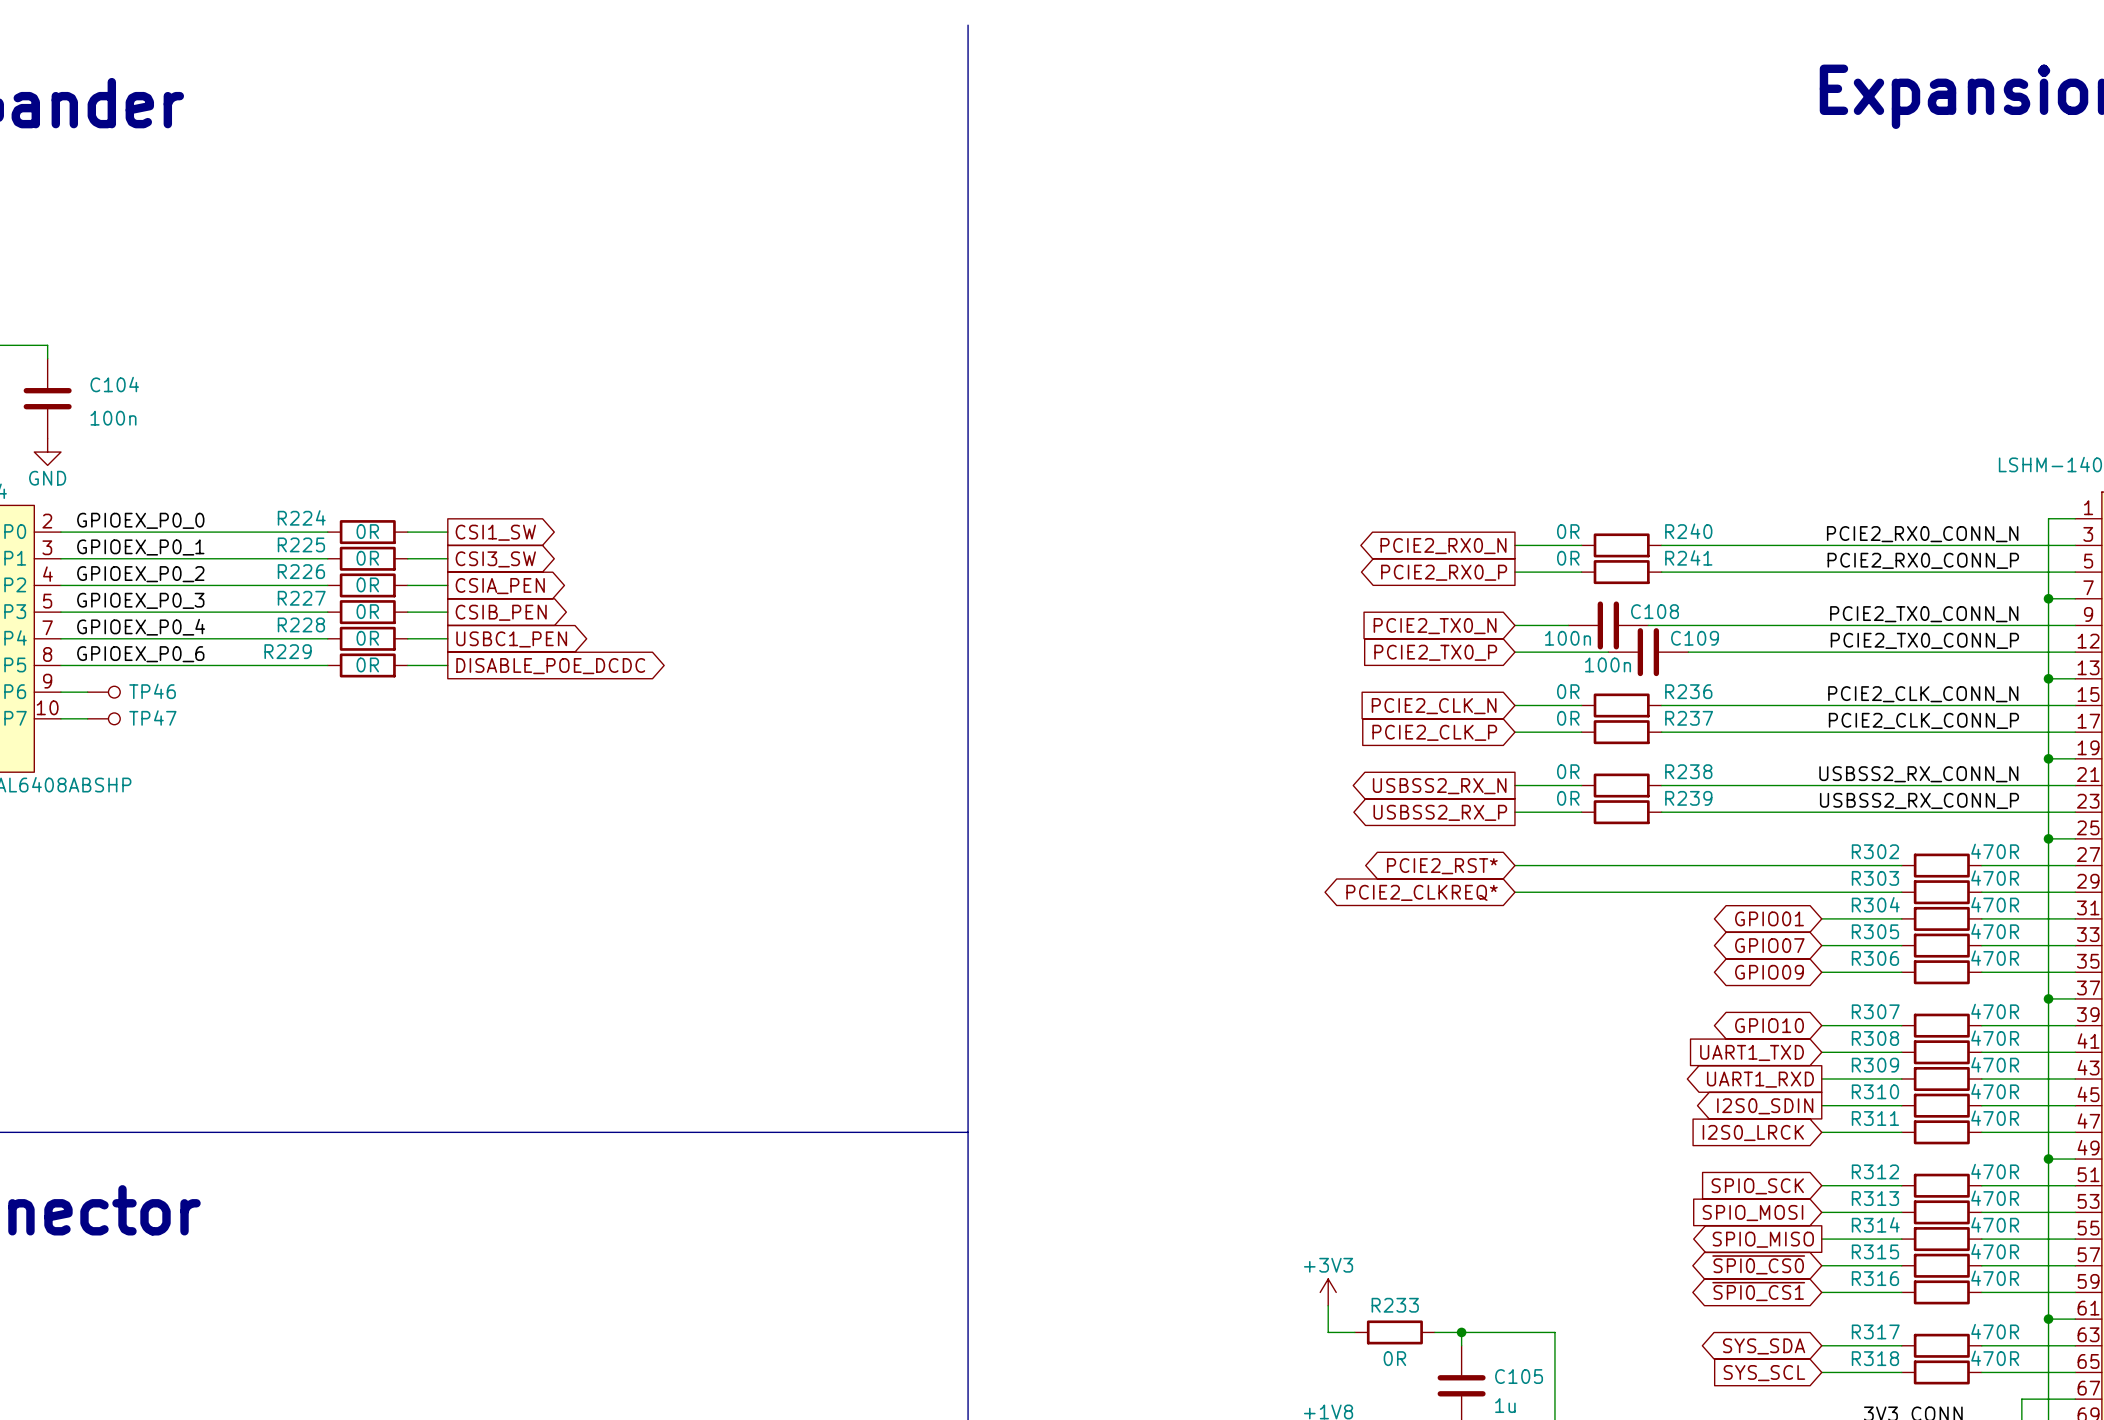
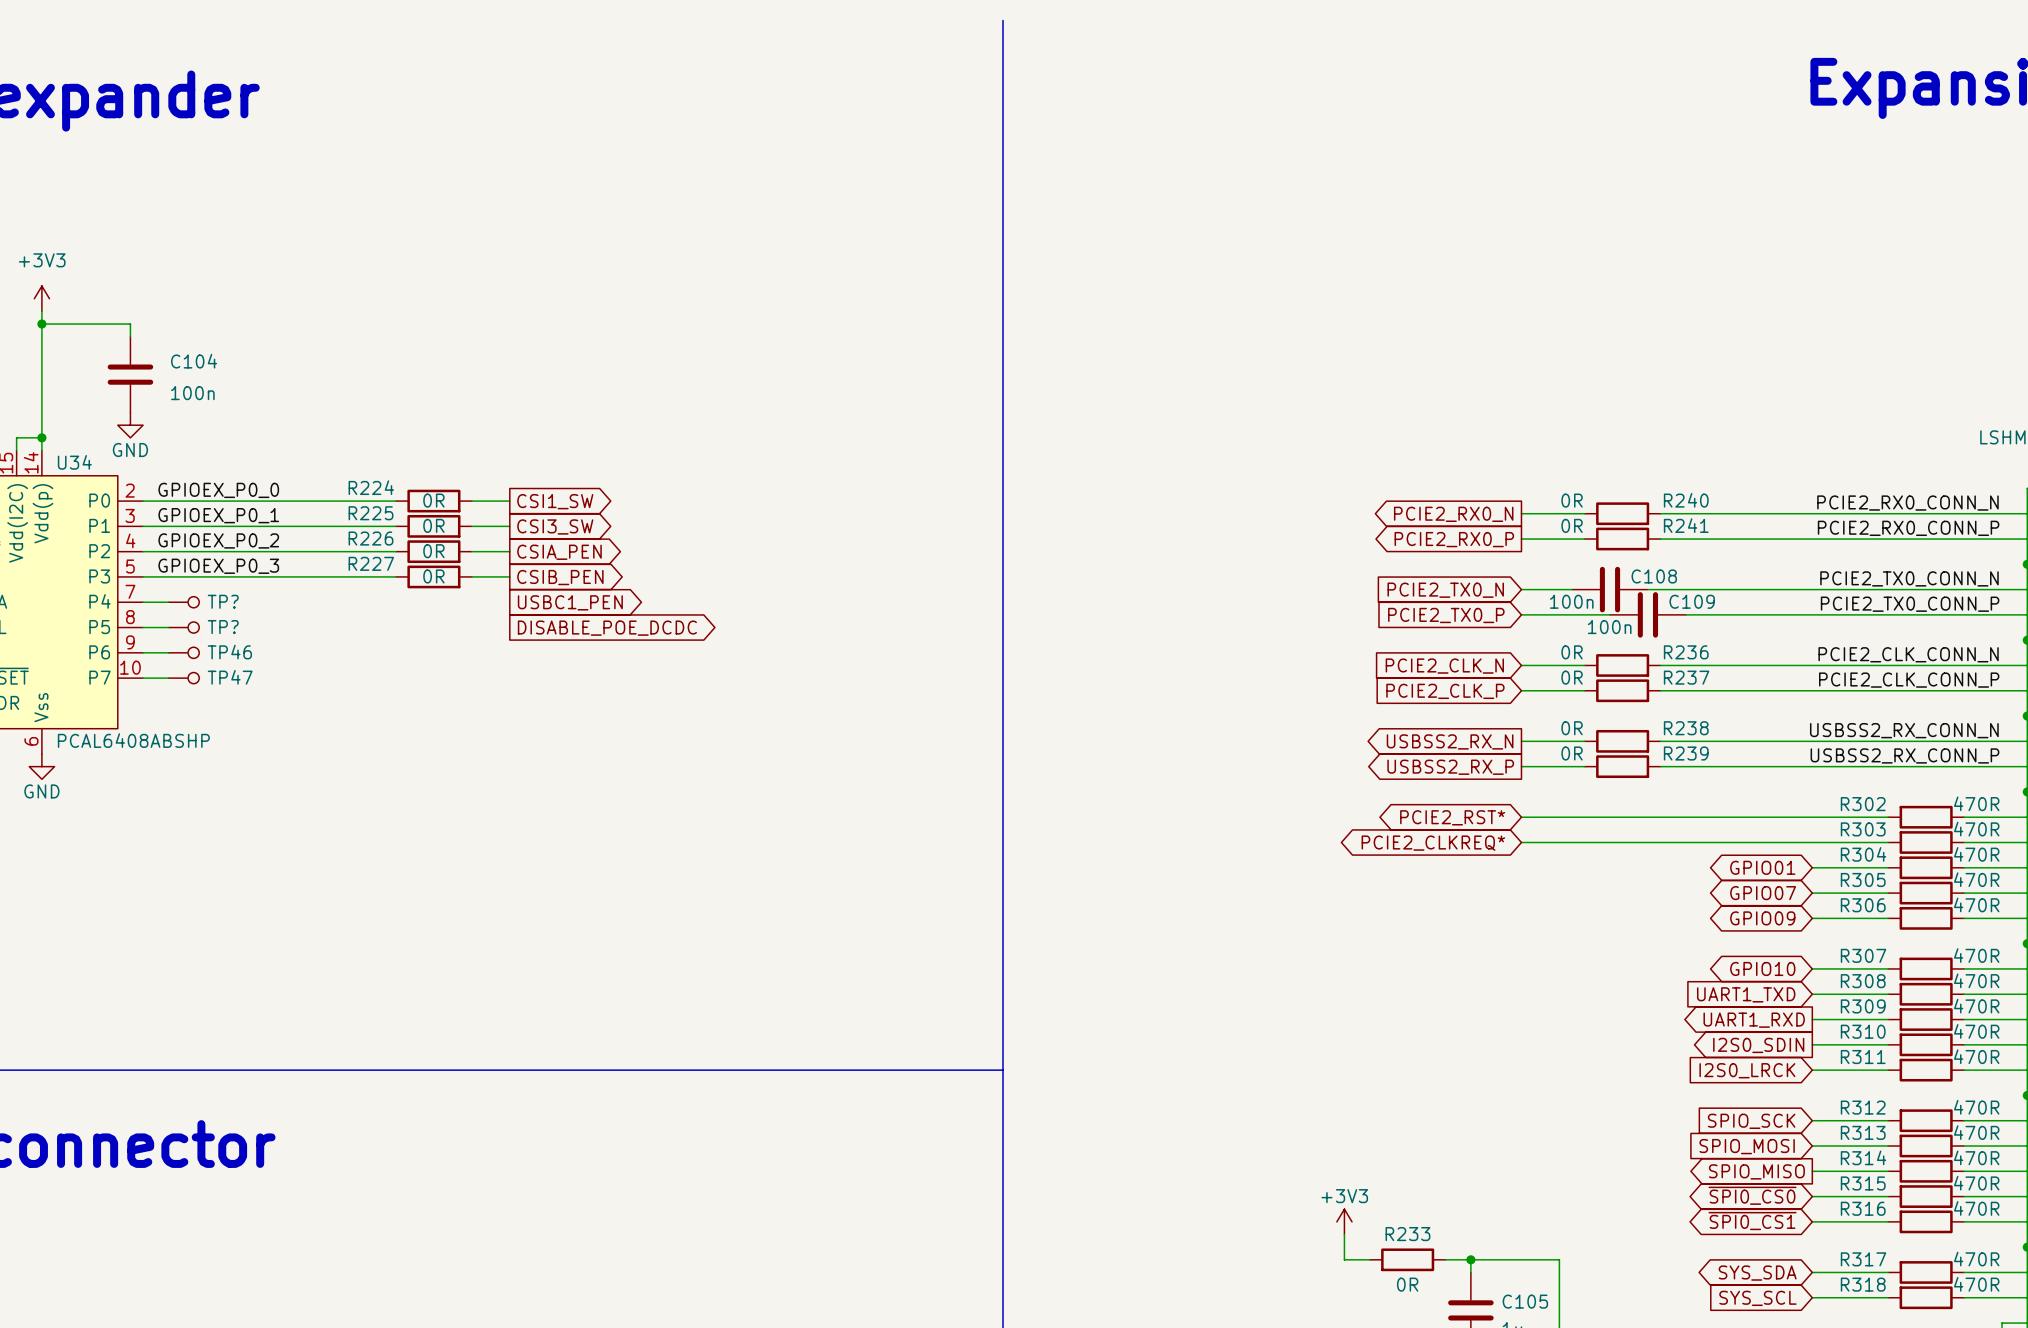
label: GPIOEX_P0_4 (141, 627) -> none
wire: (87, 638) (327, 638) -> none
TP?: none -> (183, 602)
R228: (367, 638) -> none
wire: (407, 638) (447, 638) -> none
label: GPIOEX_P0_6 (140, 654) -> none
wire: (87, 665) (327, 665) -> none
TP?: none -> (183, 627)
R229: (367, 665) -> none
wire: (407, 665) (447, 665) -> none

